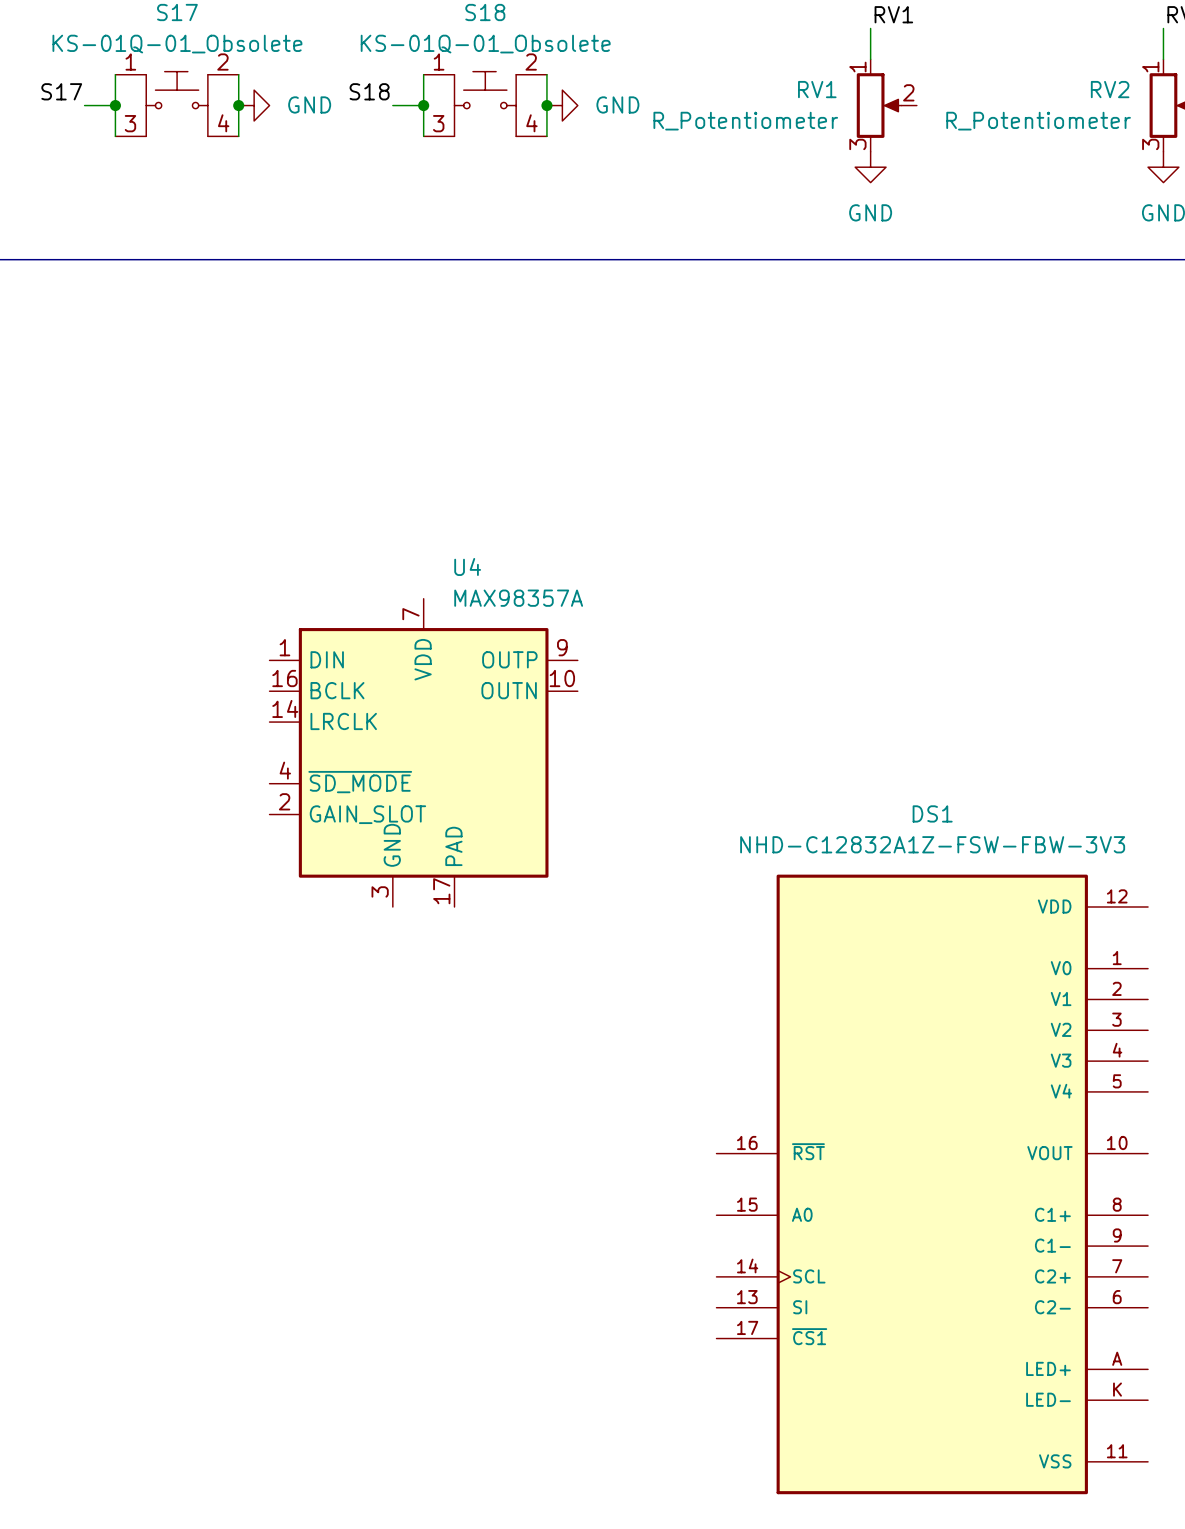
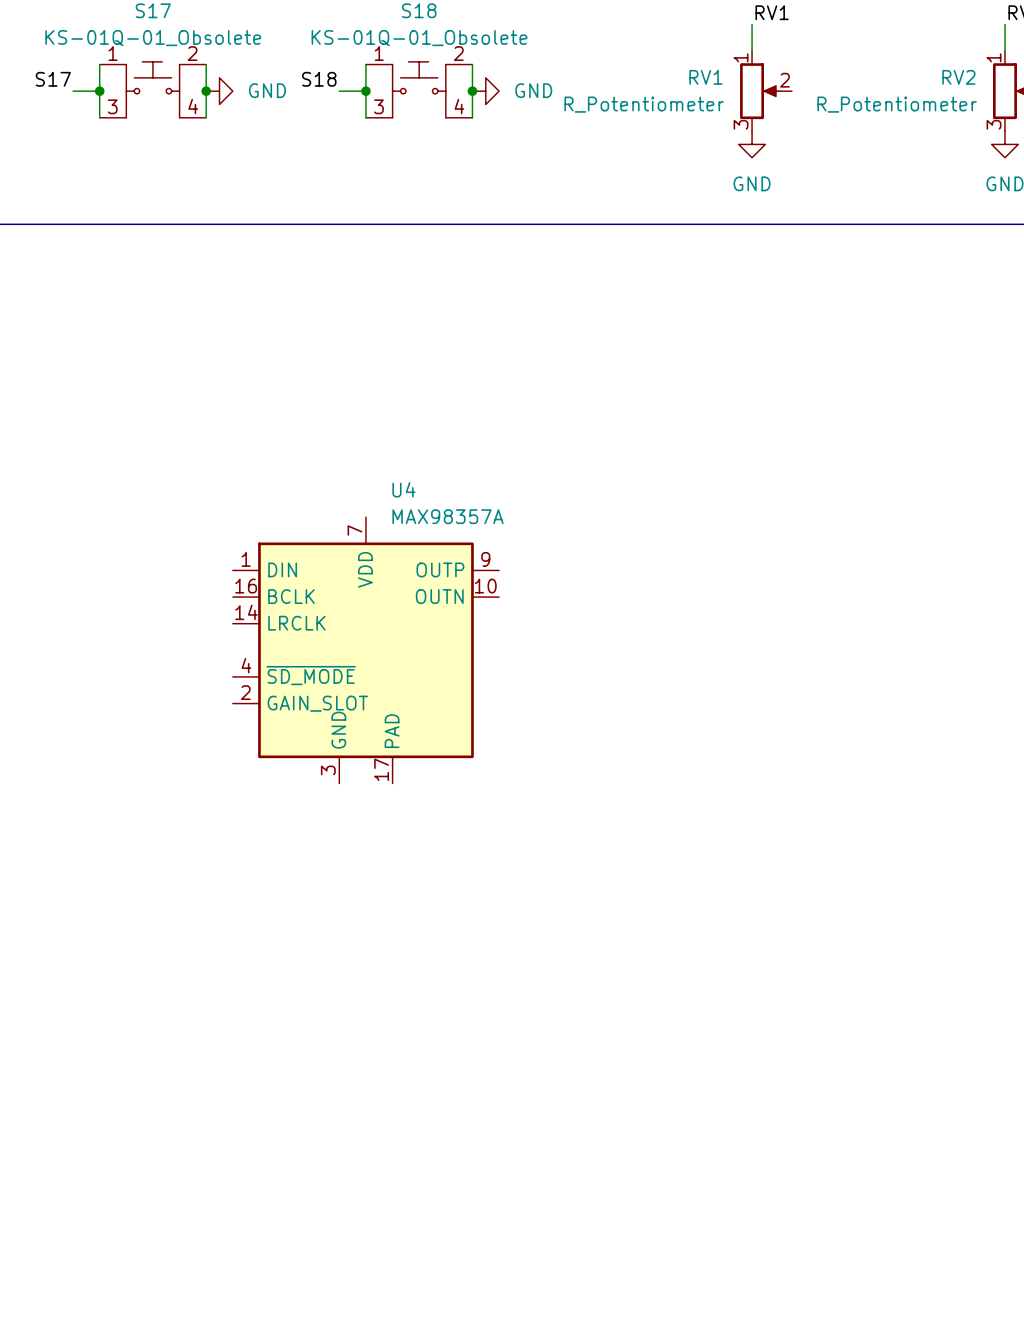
DS1: NHD-C12832A1Z-FSW-FBW-3V3 (932, 1184) -> none

